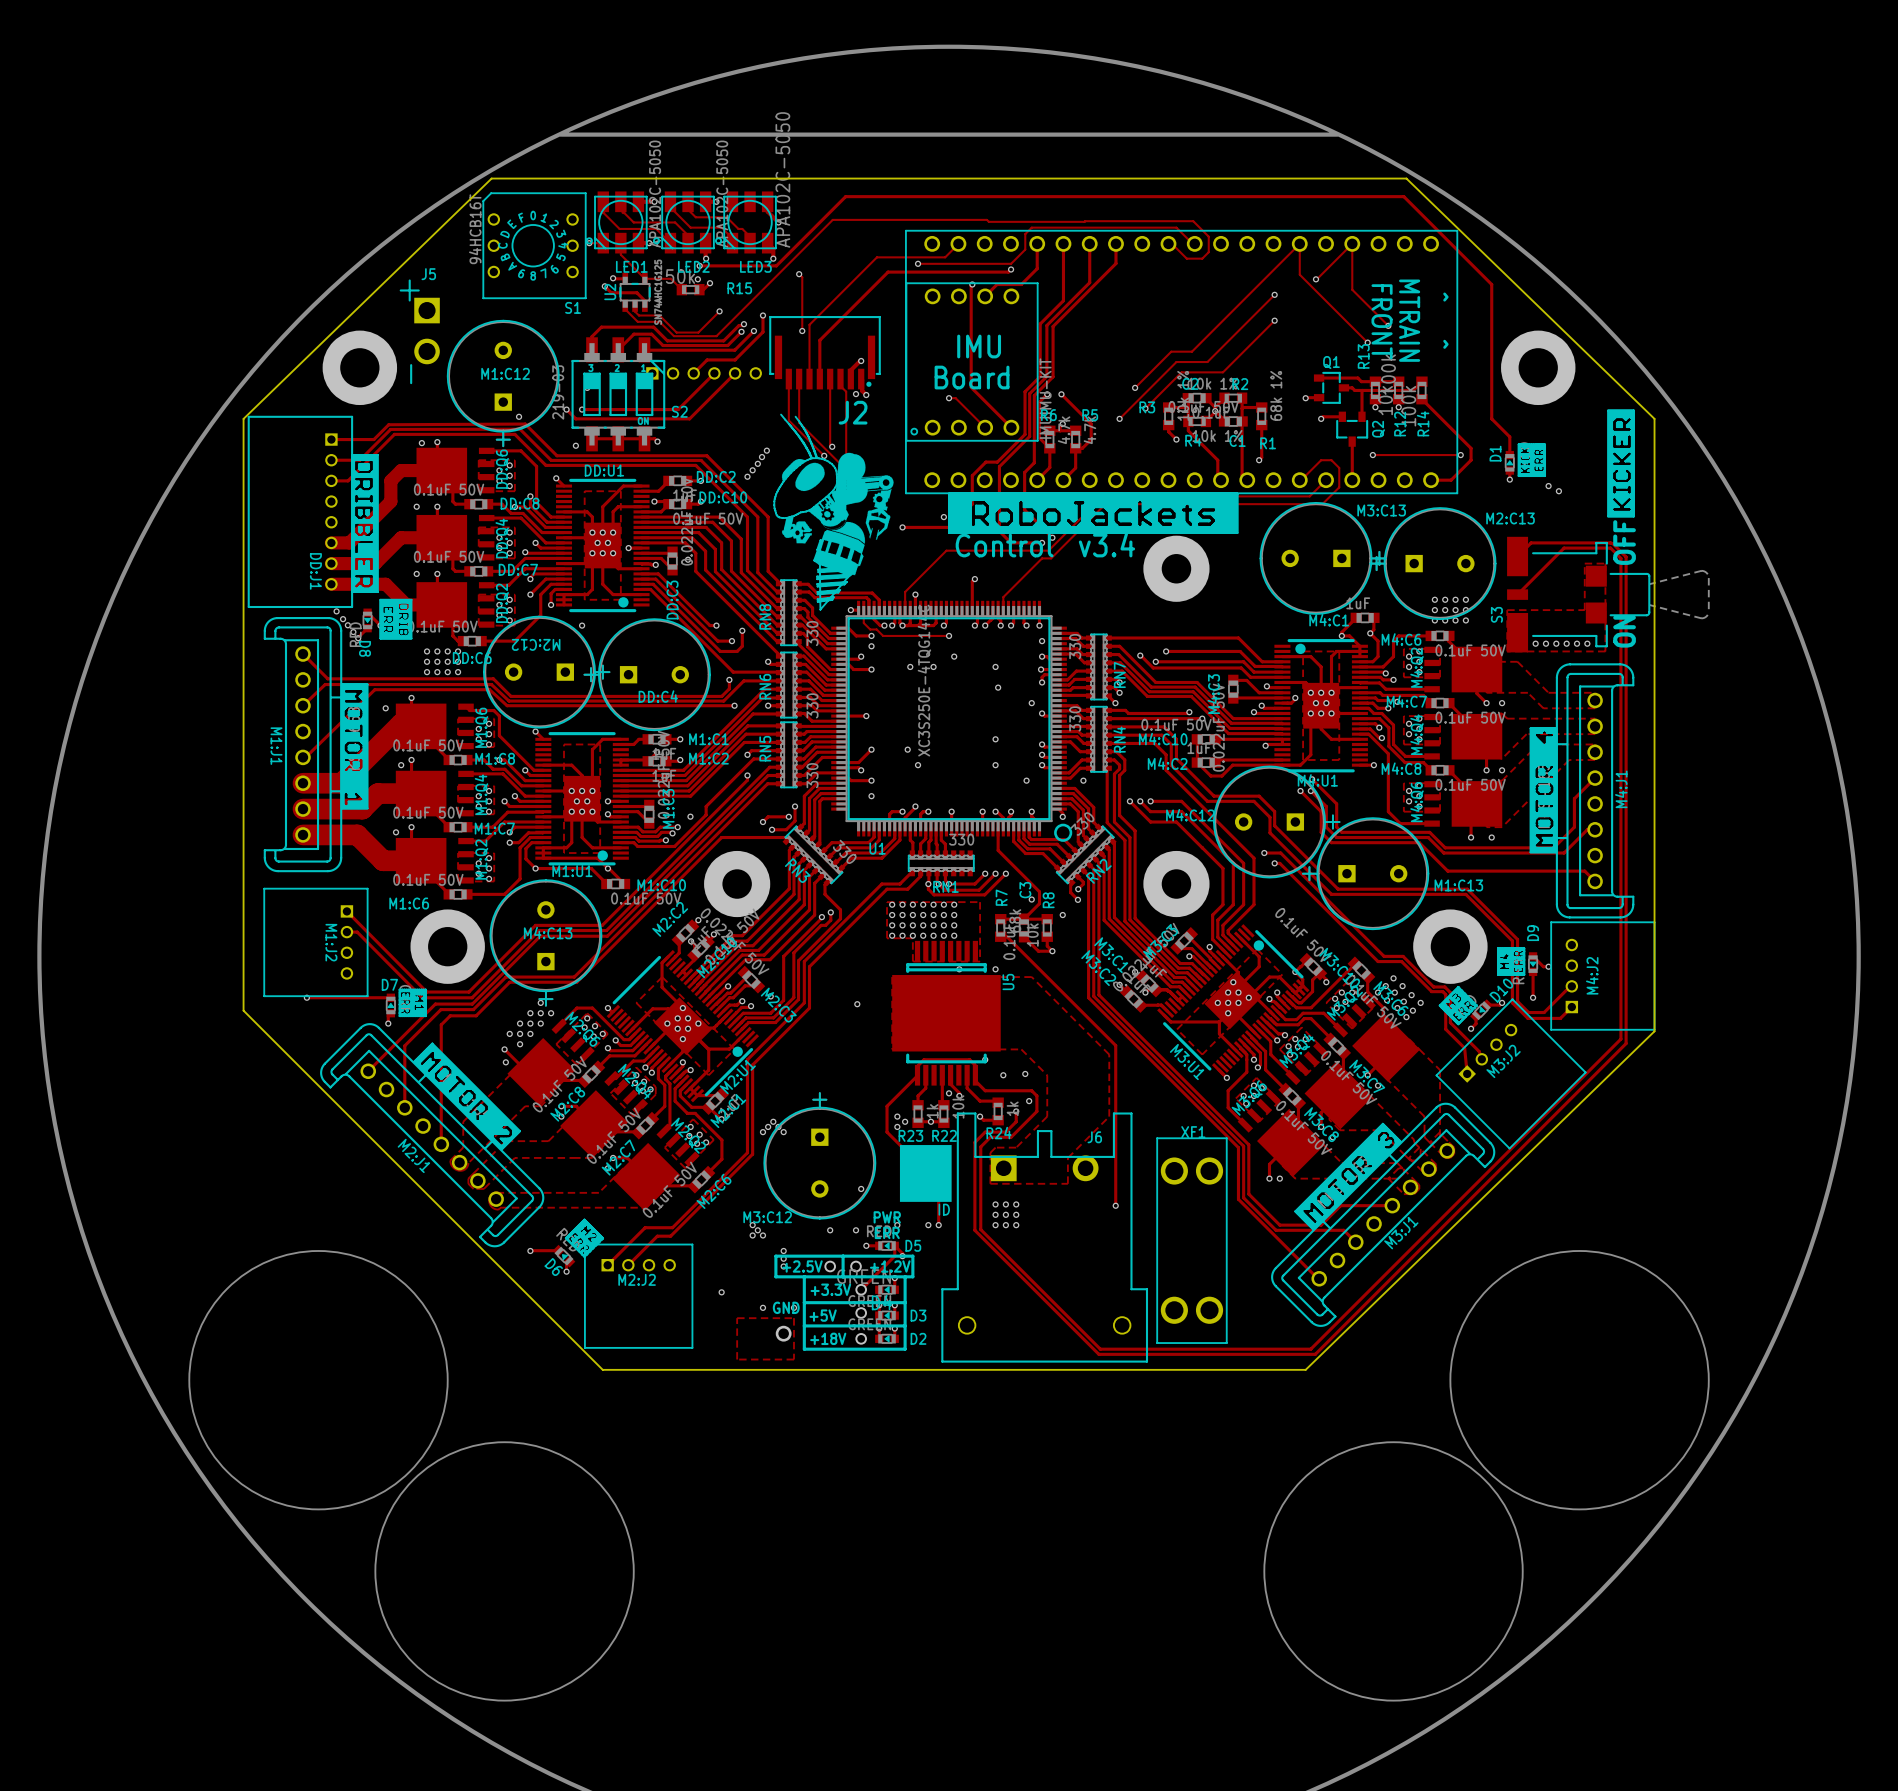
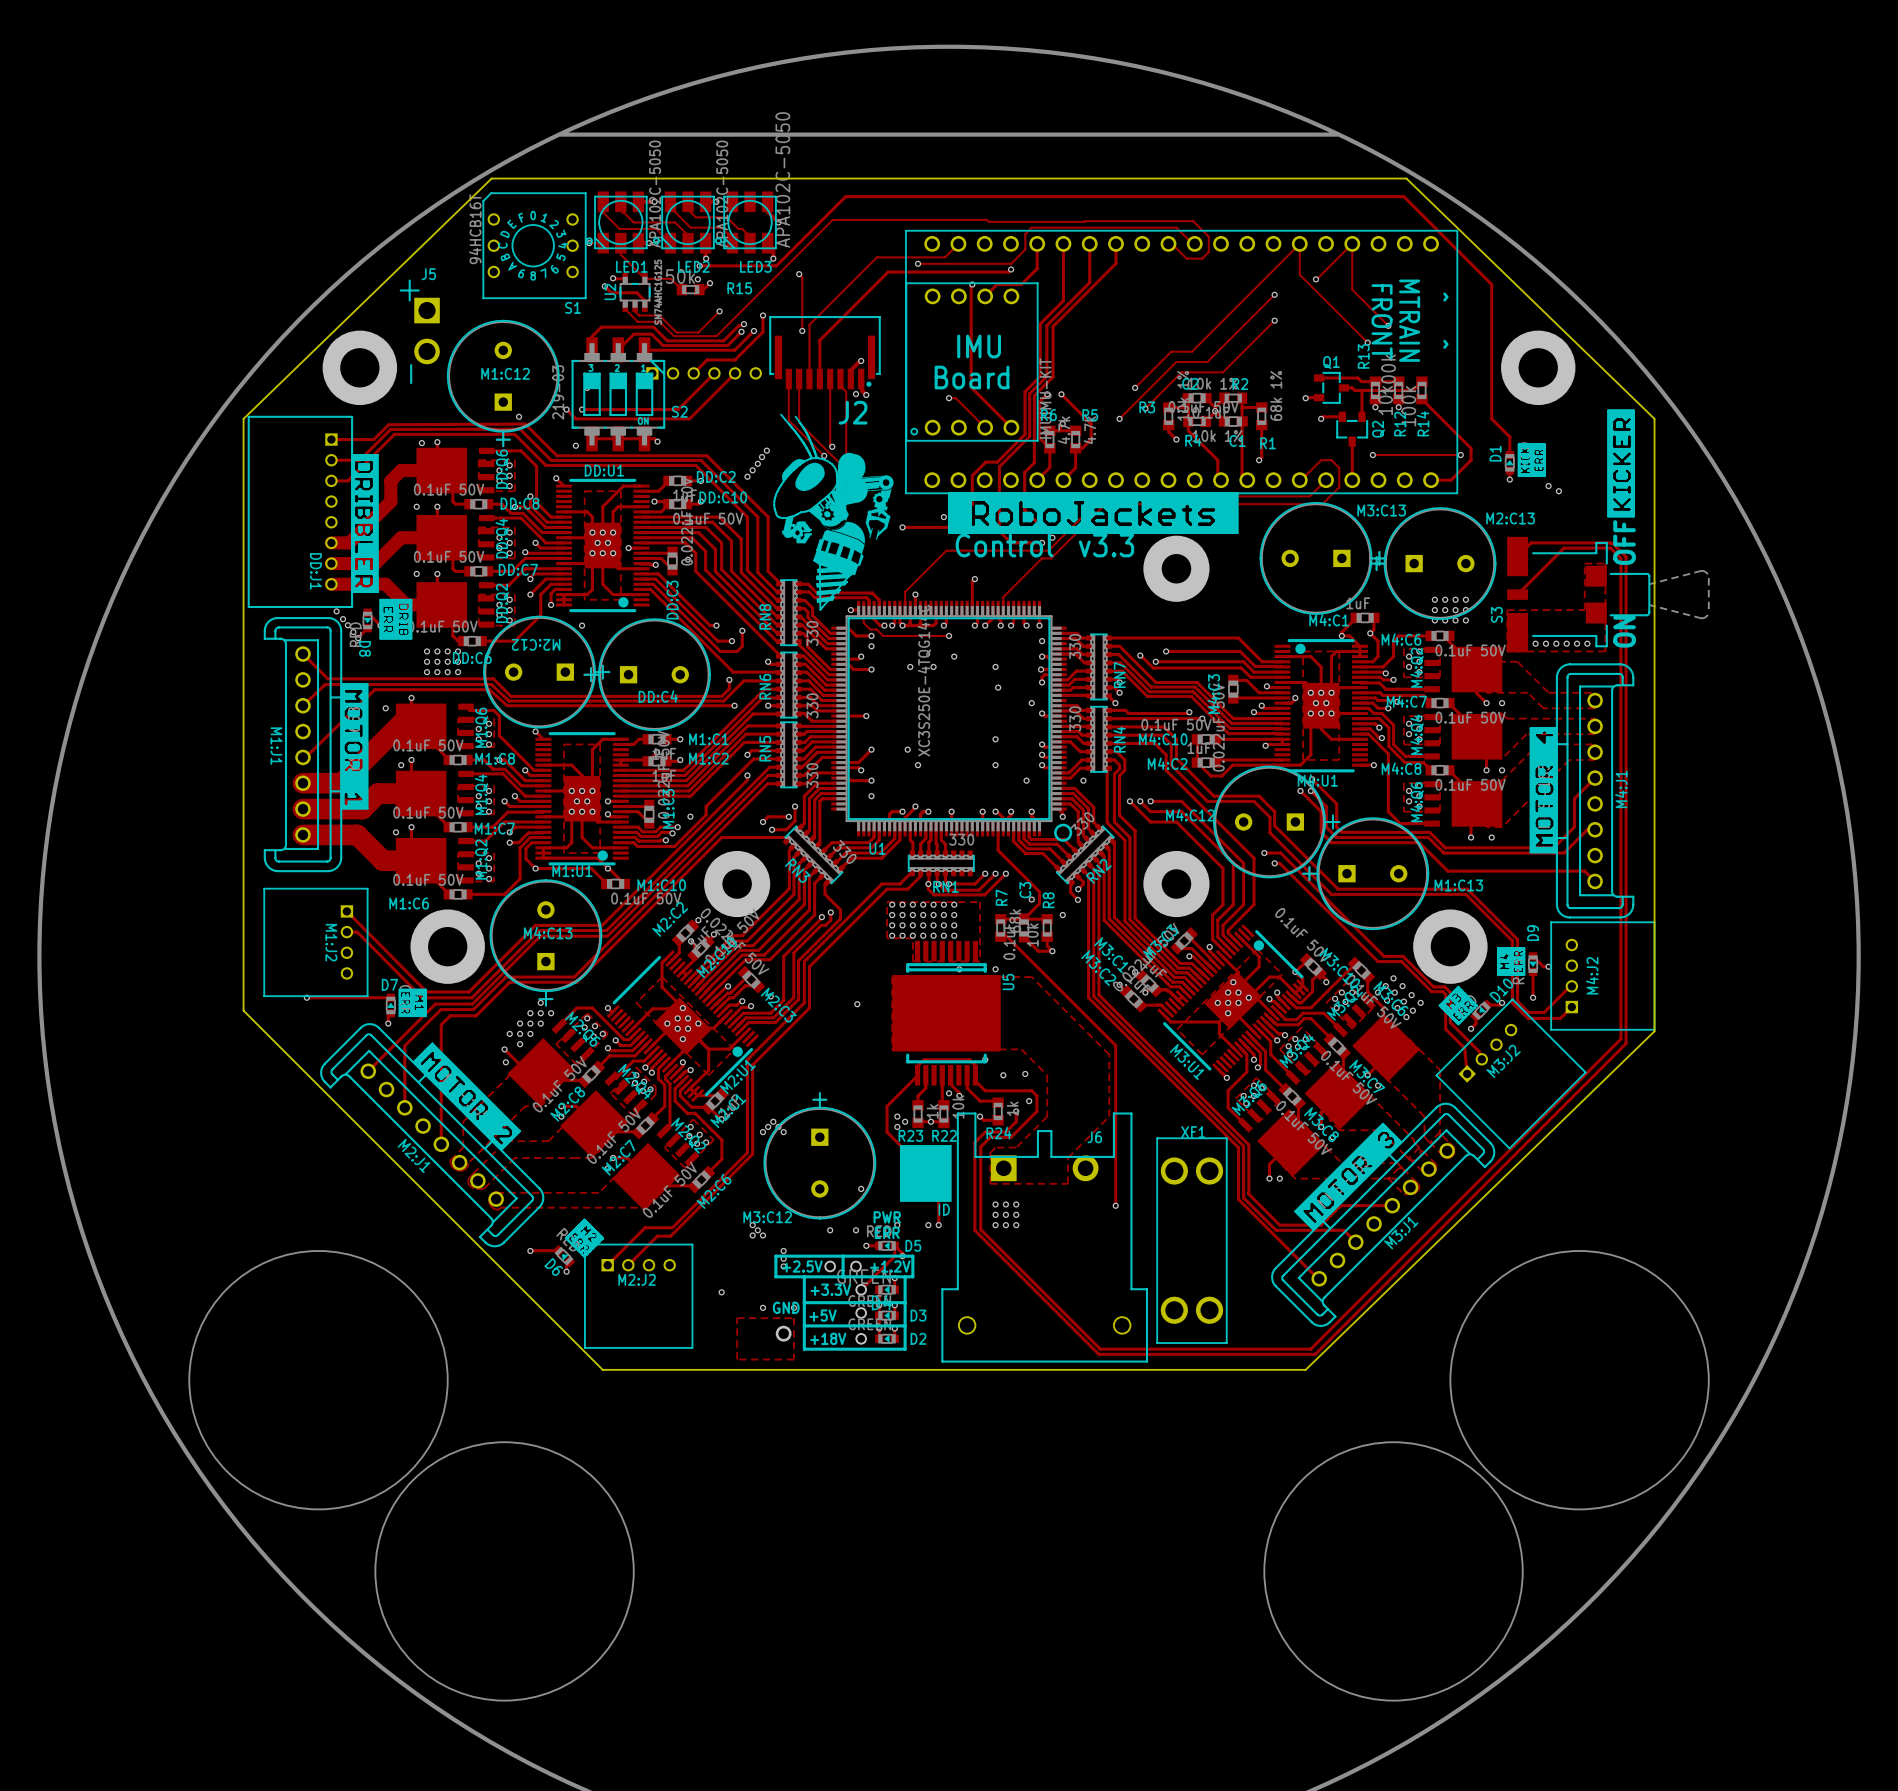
text: v3.4 (1106, 545) -> v3.3 (1106, 545)

